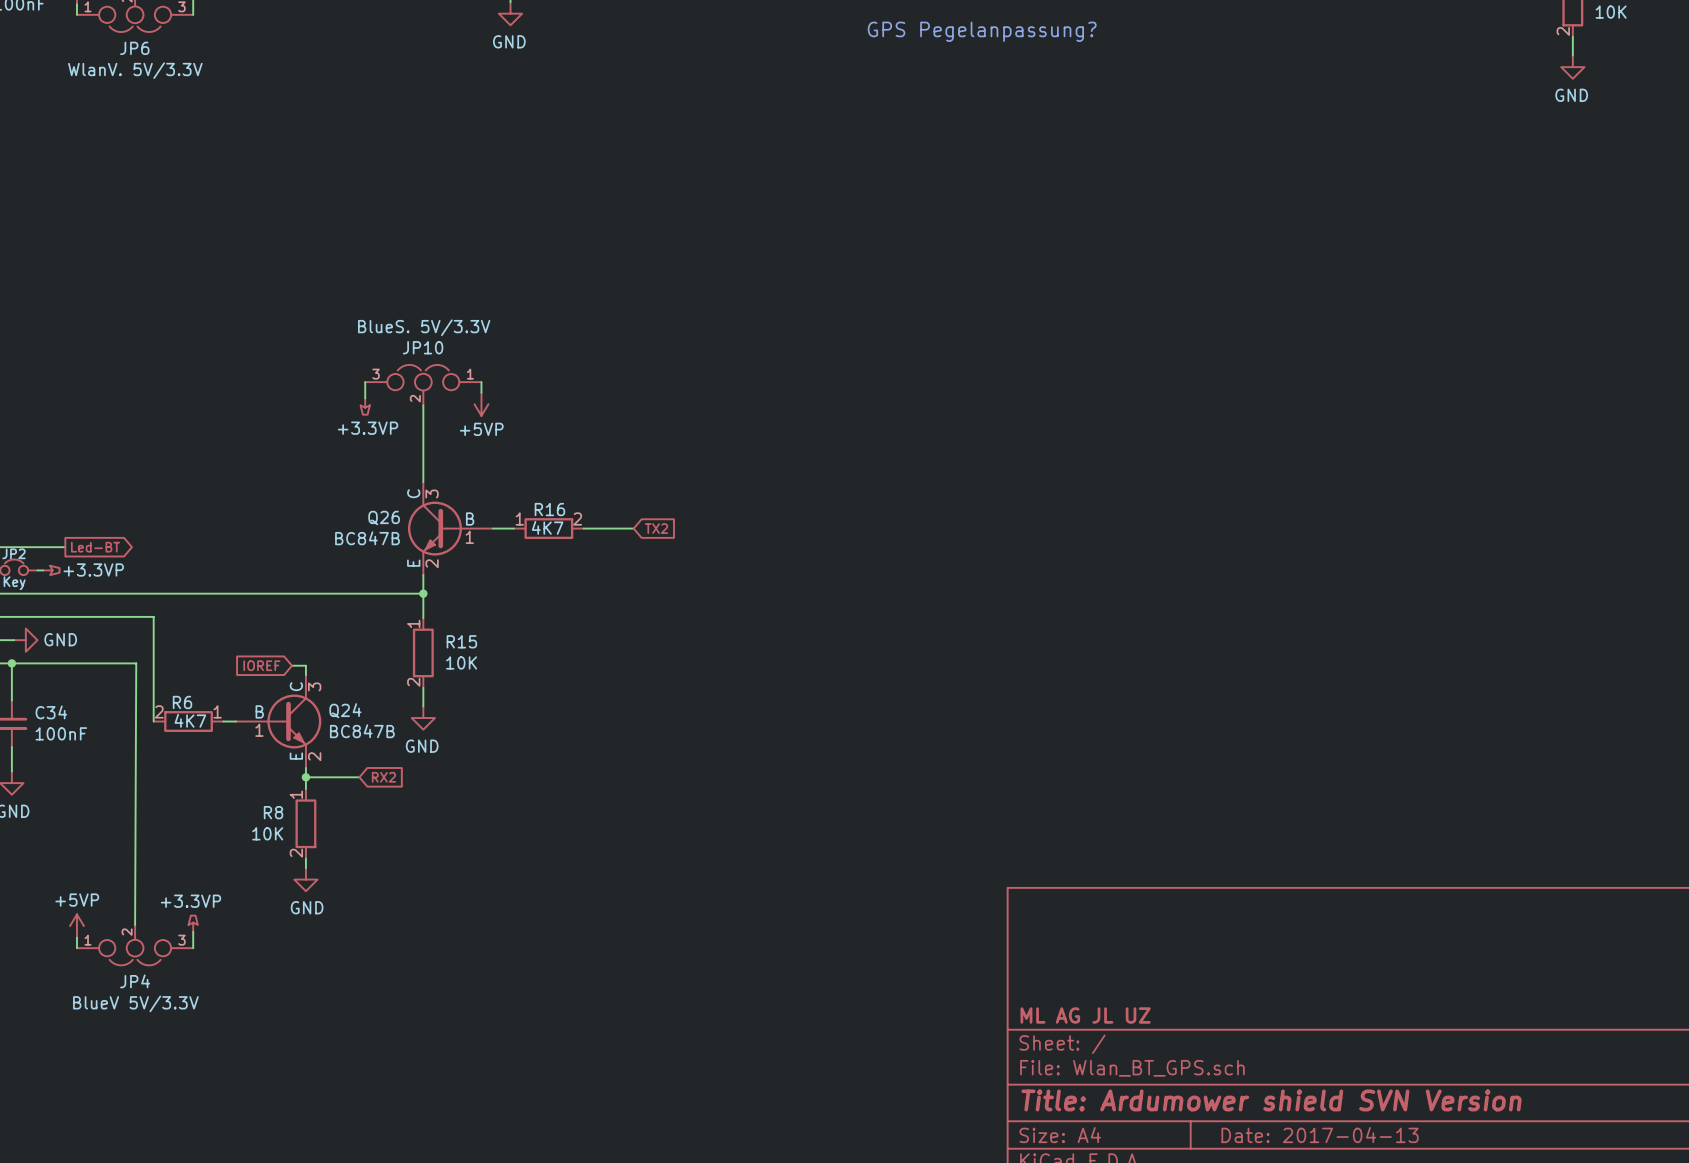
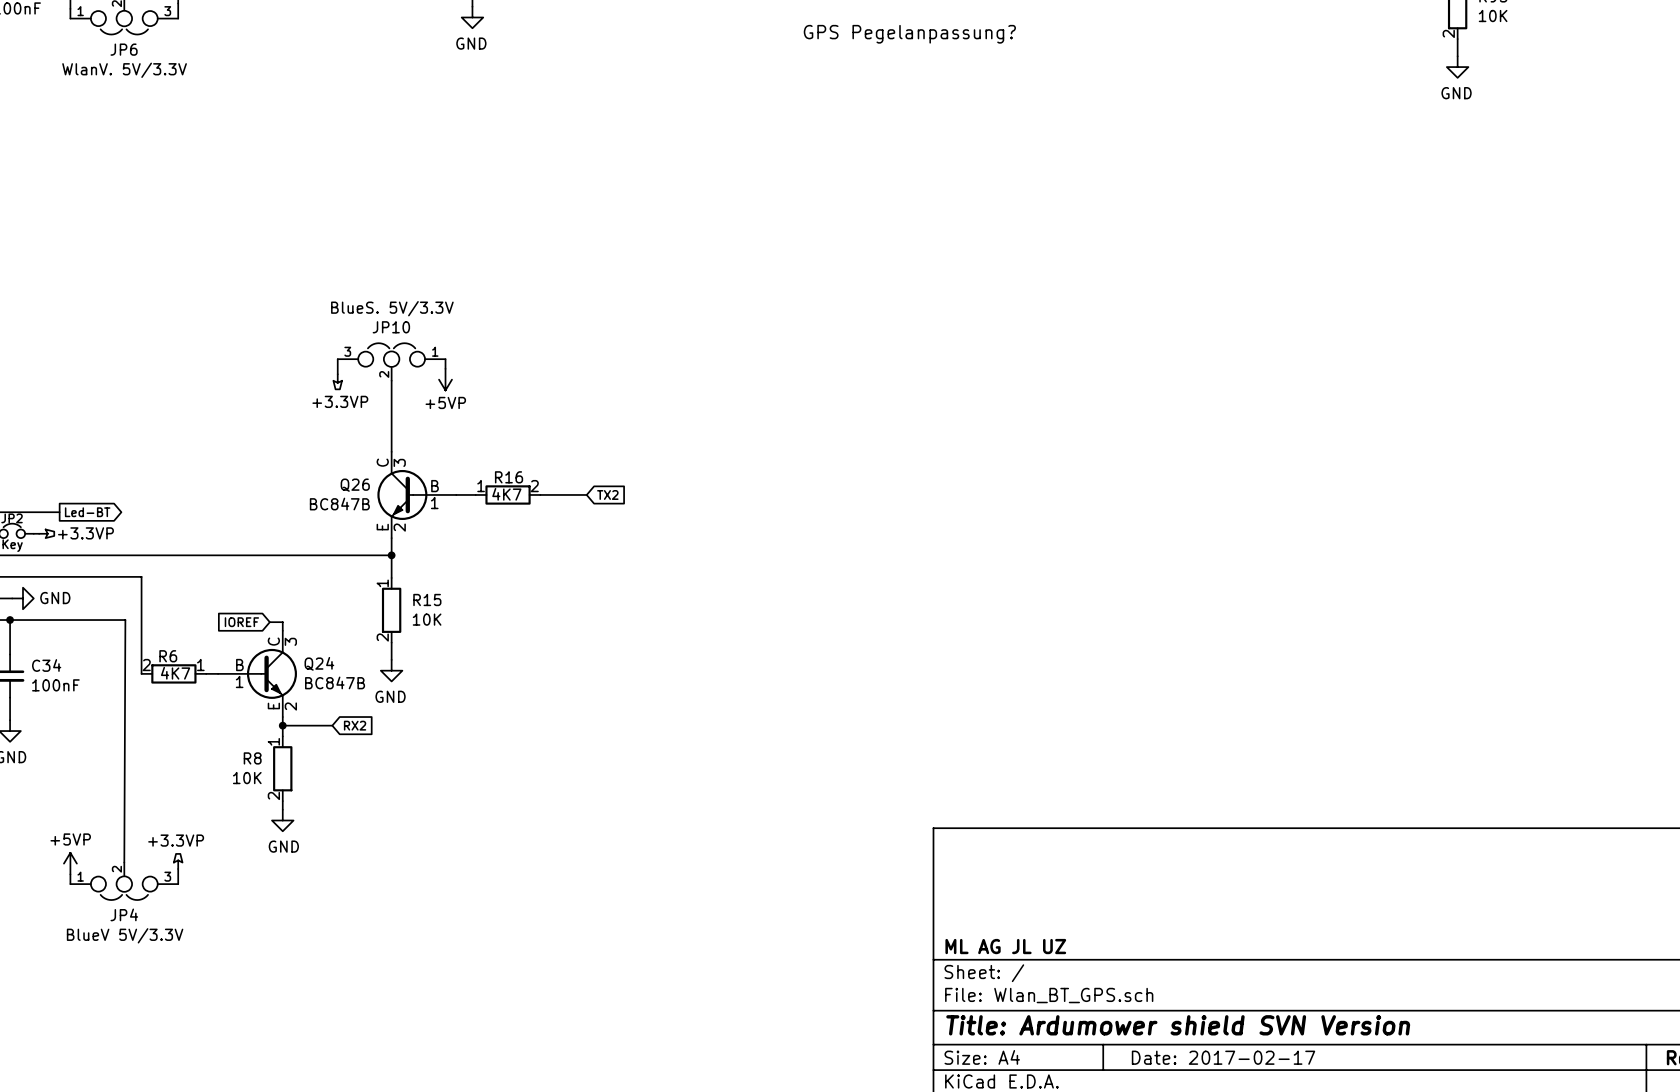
title block: Date: 2017-04-13 (1320, 1135) -> Date: 2017-02-17 (1223, 1057)

